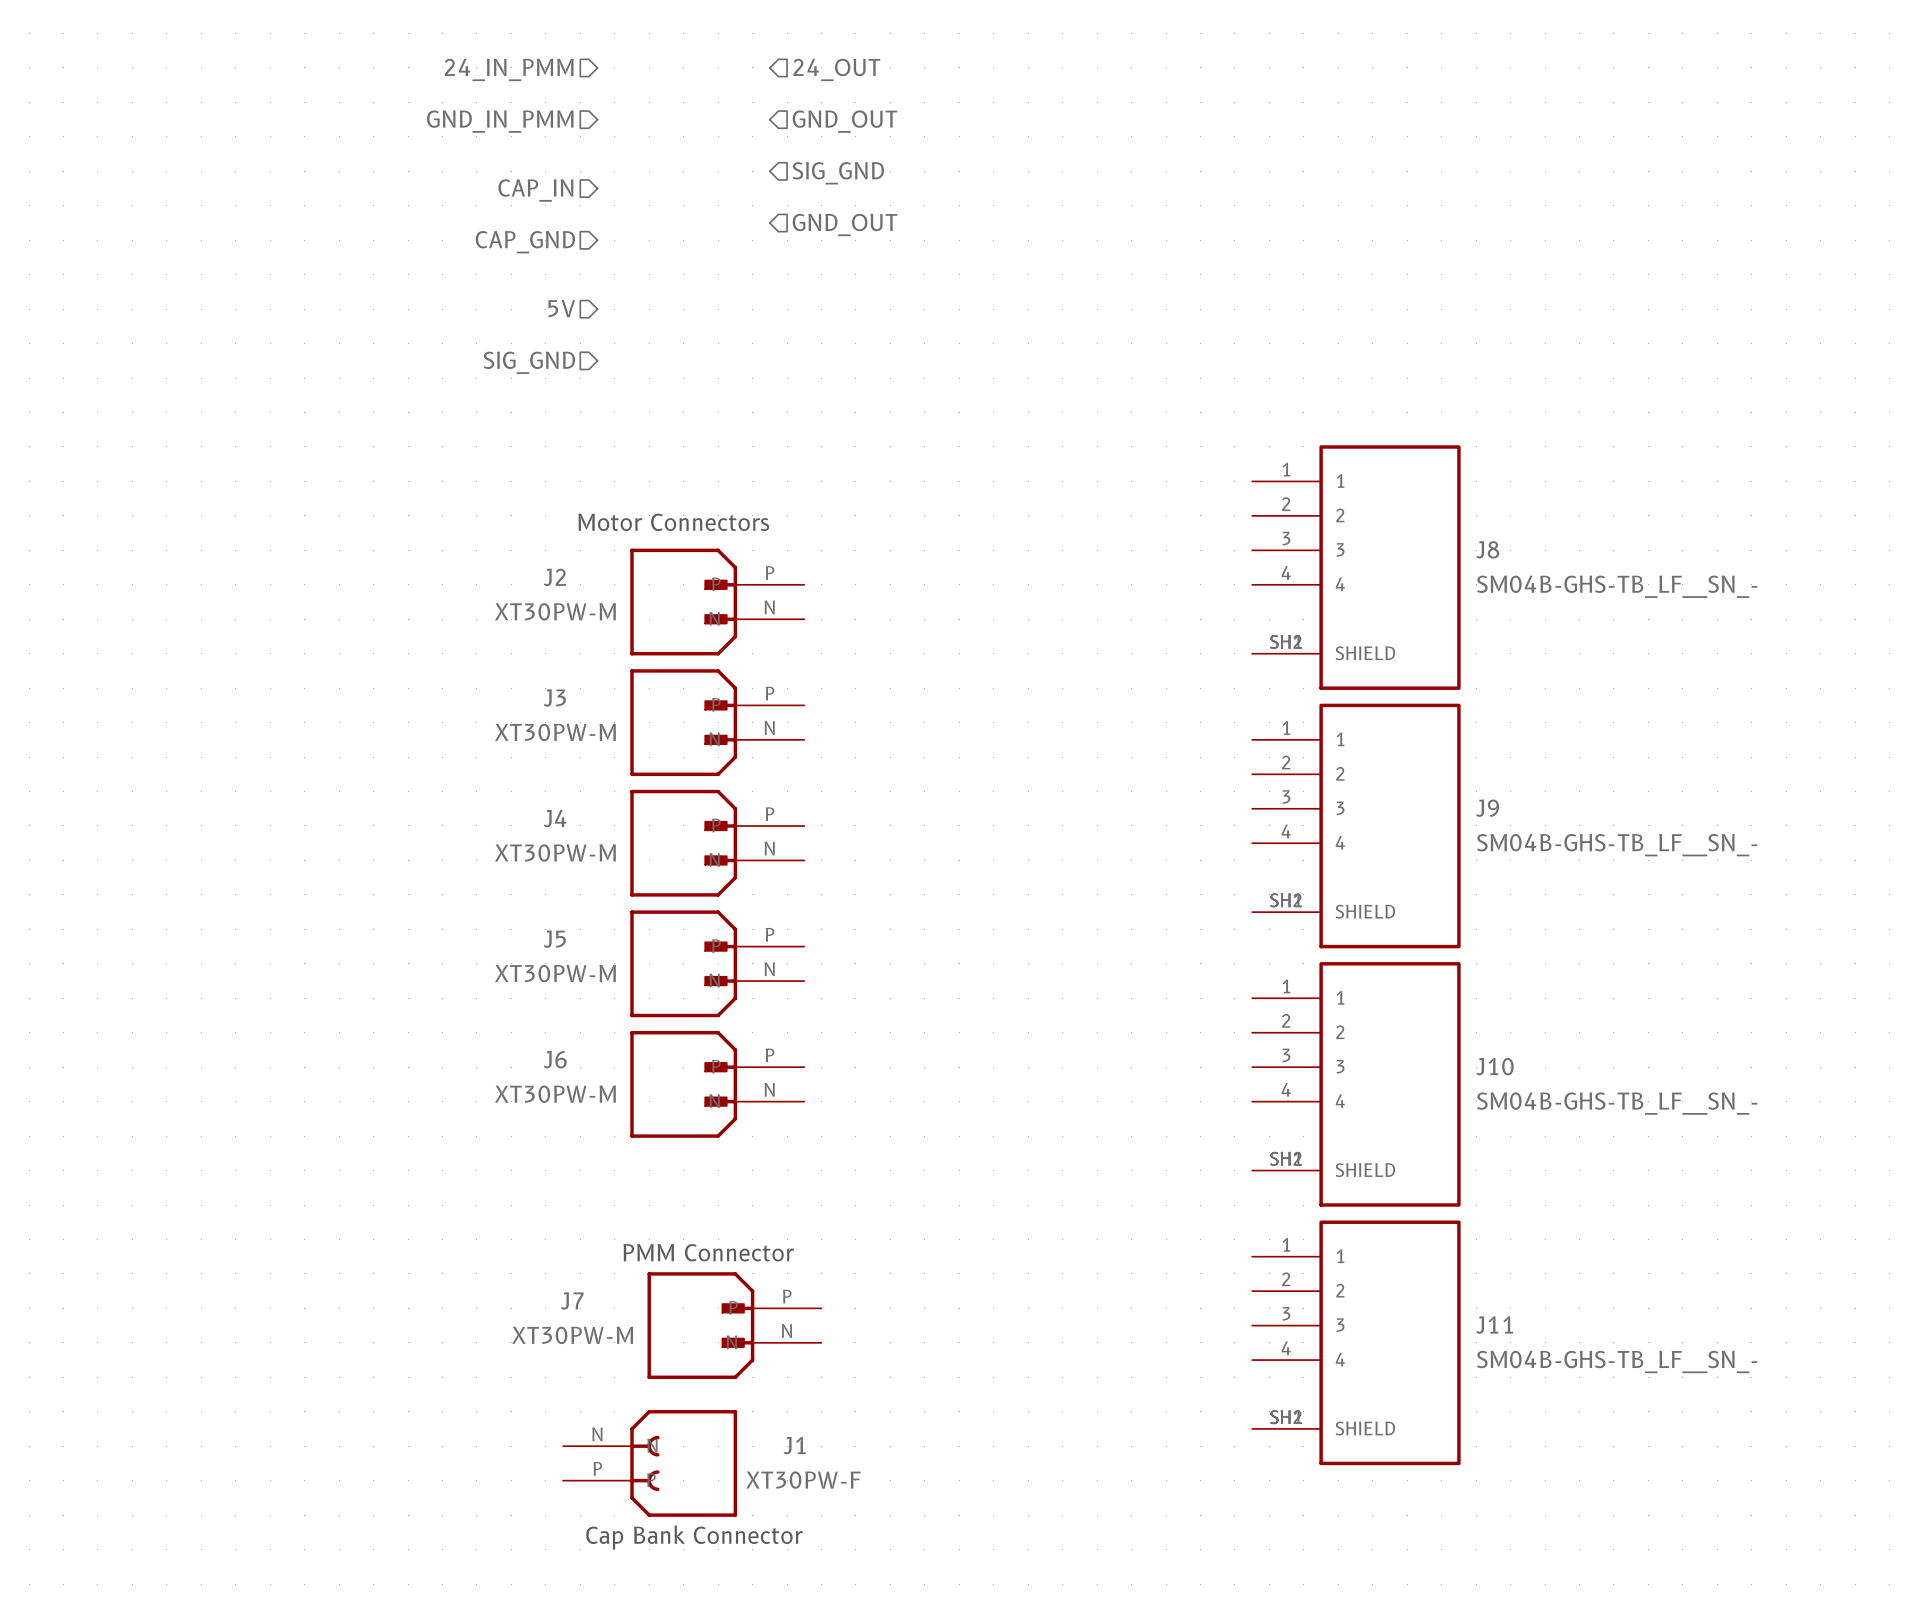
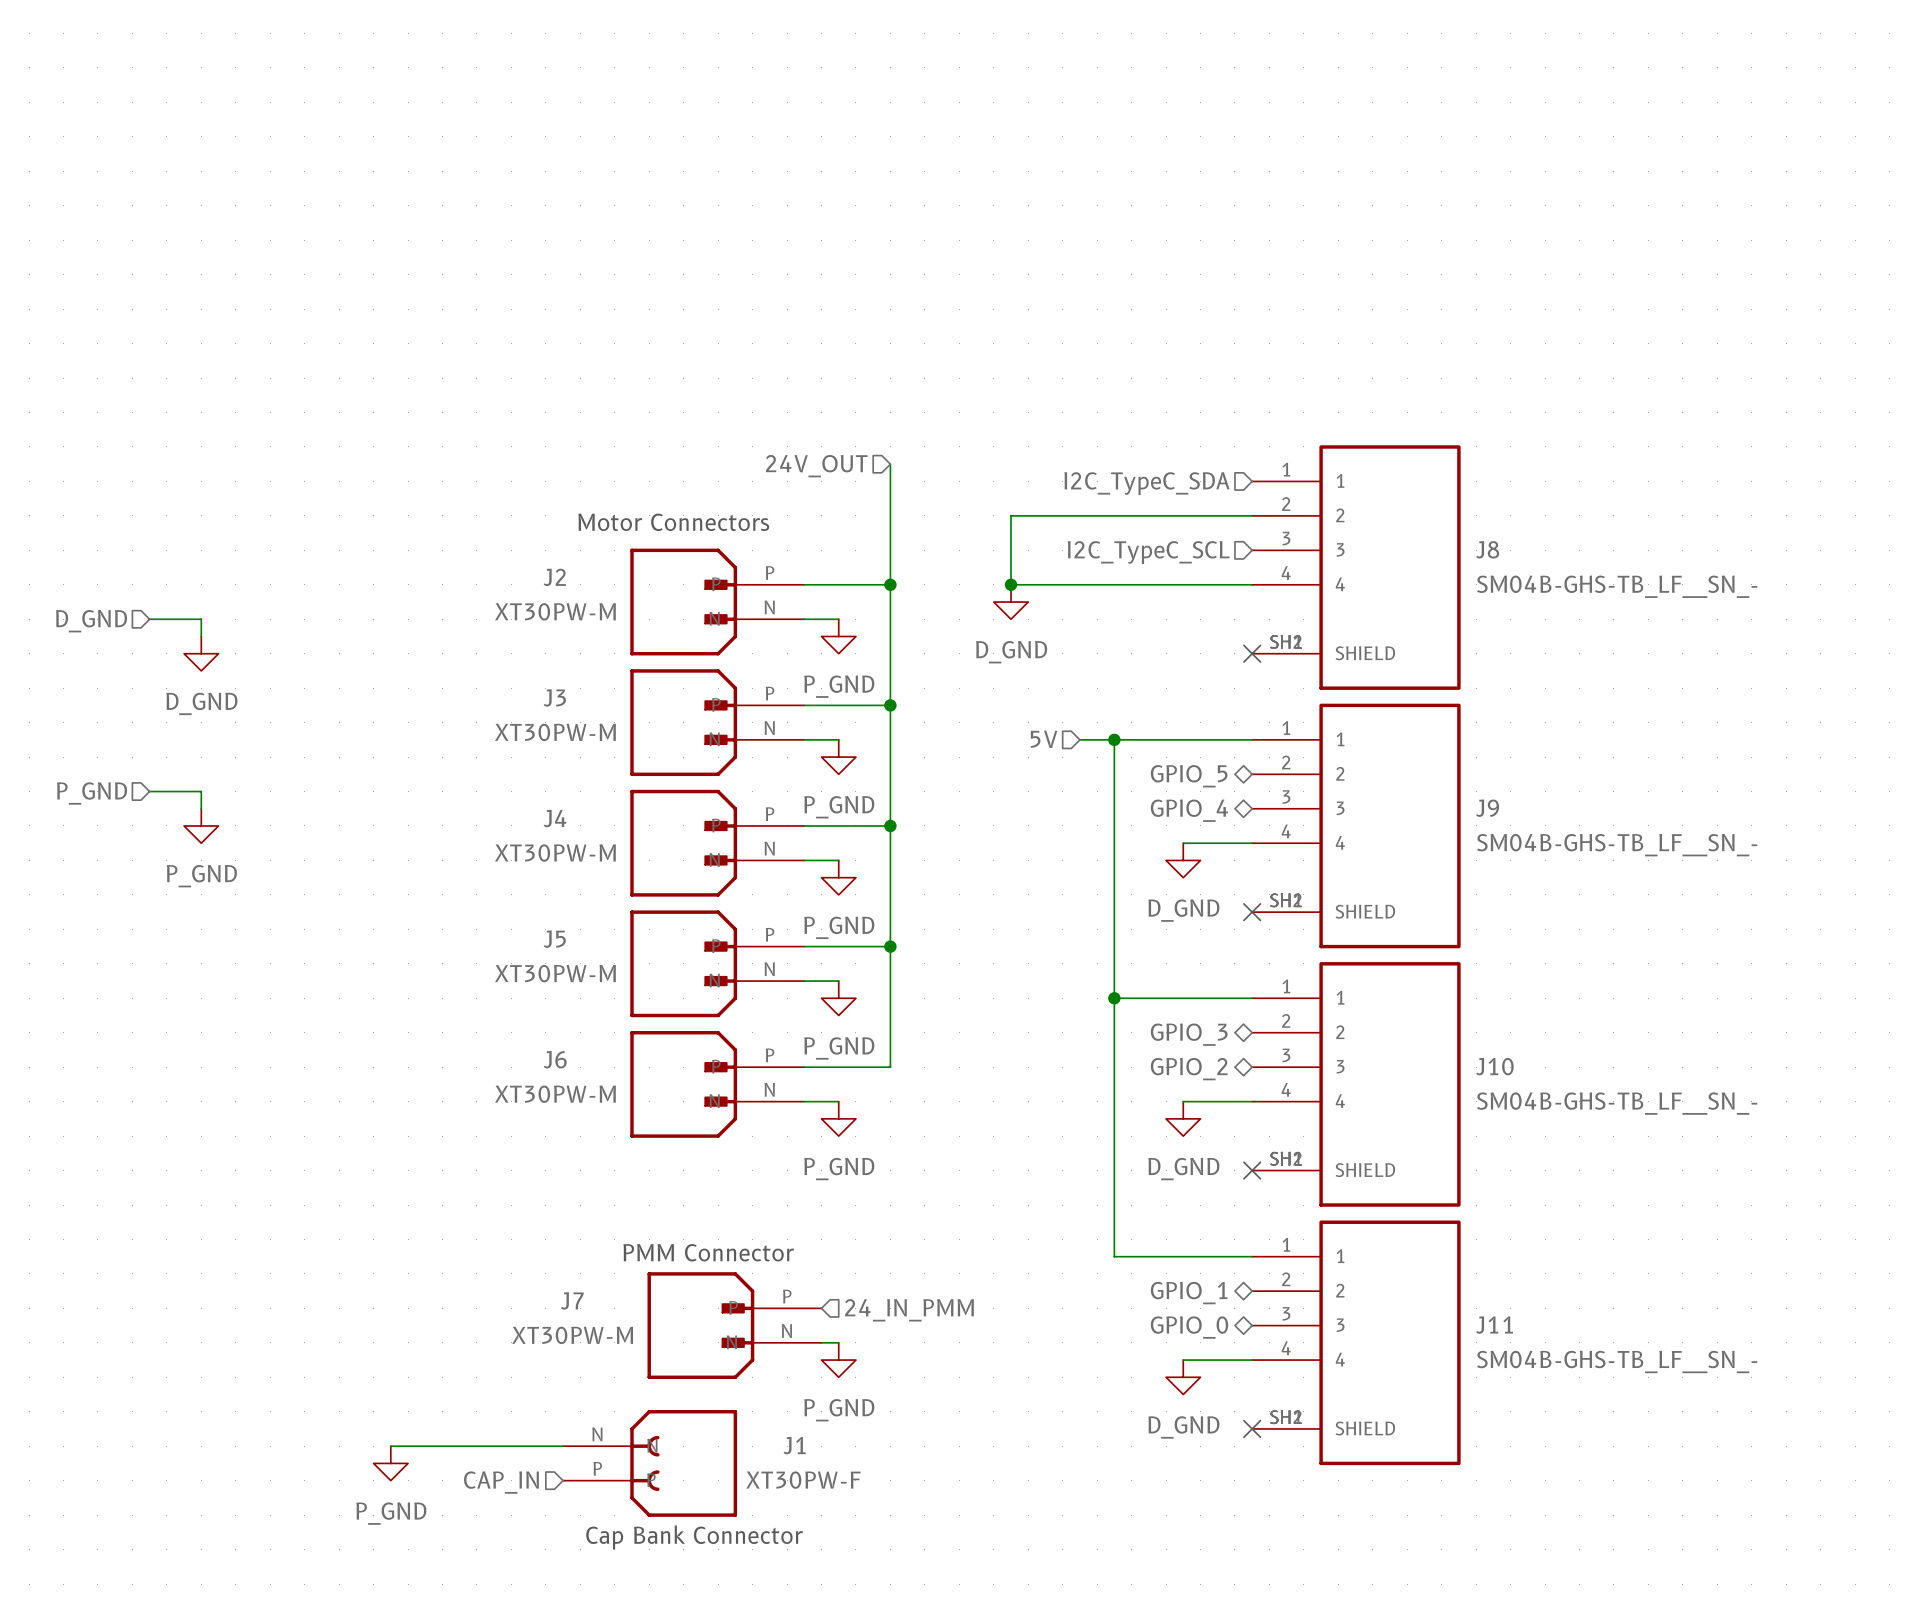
hierarchical label: 24_IN_PMM (509, 69) -> none
hierarchical label: 24_OUT (836, 69) -> none
hierarchical label: GND_IN_PMM (500, 121) -> none
hierarchical label: GND_OUT (844, 121) -> none
hierarchical label: SIG_GND (838, 173) -> none
hierarchical label: CAP_IN (535, 190) -> none
hierarchical label: GND_OUT (844, 224) -> none
hierarchical label: CAP_GND (525, 242) -> none
hierarchical label: 5V (561, 308) -> none
hierarchical label: SIG_GND (529, 362) -> none
wire: none -> (890, 464) (890, 1067) (804, 1067)
hierarchical label: none -> 24V_OUT (816, 466)
hierarchical label: none -> I2C_TypeC_SDA (1146, 483)
wire: none -> (1252, 515) (1011, 515) (1011, 584) (1252, 584)
hierarchical label: none -> I2C_TypeC_SCL (1148, 552)
wire: none -> (804, 584) (890, 584)
junction: none -> (890, 584)
junction: none -> (1011, 584)
power symbol: none -> D_GND (1011, 602)
wire: none -> (149, 619) (201, 619) (201, 636)
wire: none -> (804, 619) (838, 619)
hierarchical label: none -> D_GND (91, 621)
power symbol: none -> P_GND (838, 636)
power symbol: none -> D_GND (201, 653)
no-connect mark: none -> (1252, 653)
wire: none -> (804, 705) (890, 705)
junction: none -> (890, 705)
wire: none -> (804, 739) (838, 739)
hierarchical label: none -> 5V (1044, 739)
wire: none -> (1079, 739) (1252, 739)
wire: none -> (1114, 739) (1114, 1256) (1252, 1256)
junction: none -> (1114, 739)
power symbol: none -> P_GND (838, 757)
hierarchical label: none -> GPIO_5 (1189, 776)
wire: none -> (149, 791) (201, 791) (201, 808)
hierarchical label: none -> P_GND (92, 793)
hierarchical label: none -> GPIO_4 (1189, 810)
power symbol: none -> P_GND (201, 825)
wire: none -> (804, 825) (890, 825)
junction: none -> (890, 825)
wire: none -> (1183, 843) (1252, 843)
wire: none -> (804, 860) (838, 860)
power symbol: none -> D_GND (1183, 860)
power symbol: none -> P_GND (838, 877)
no-connect mark: none -> (1252, 912)
wire: none -> (804, 946) (890, 946)
junction: none -> (890, 946)
wire: none -> (804, 981) (838, 981)
power symbol: none -> P_GND (838, 998)
wire: none -> (1114, 998) (1252, 998)
junction: none -> (1114, 998)
hierarchical label: none -> GPIO_3 (1189, 1034)
hierarchical label: none -> GPIO_2 (1189, 1069)
wire: none -> (804, 1101) (838, 1101)
wire: none -> (1183, 1101) (1252, 1101)
power symbol: none -> P_GND (838, 1118)
power symbol: none -> D_GND (1183, 1118)
no-connect mark: none -> (1252, 1170)
hierarchical label: none -> GPIO_1 (1189, 1293)
hierarchical label: none -> 24_IN_PMM (909, 1310)
hierarchical label: none -> GPIO_0 (1189, 1327)
wire: none -> (821, 1342) (838, 1342)
power symbol: none -> P_GND (838, 1360)
wire: none -> (1183, 1360) (1252, 1360)
power symbol: none -> D_GND (1183, 1377)
no-connect mark: none -> (1252, 1428)
wire: none -> (390, 1446) (563, 1446)
power symbol: none -> P_GND (390, 1463)
hierarchical label: none -> CAP_IN (501, 1482)

